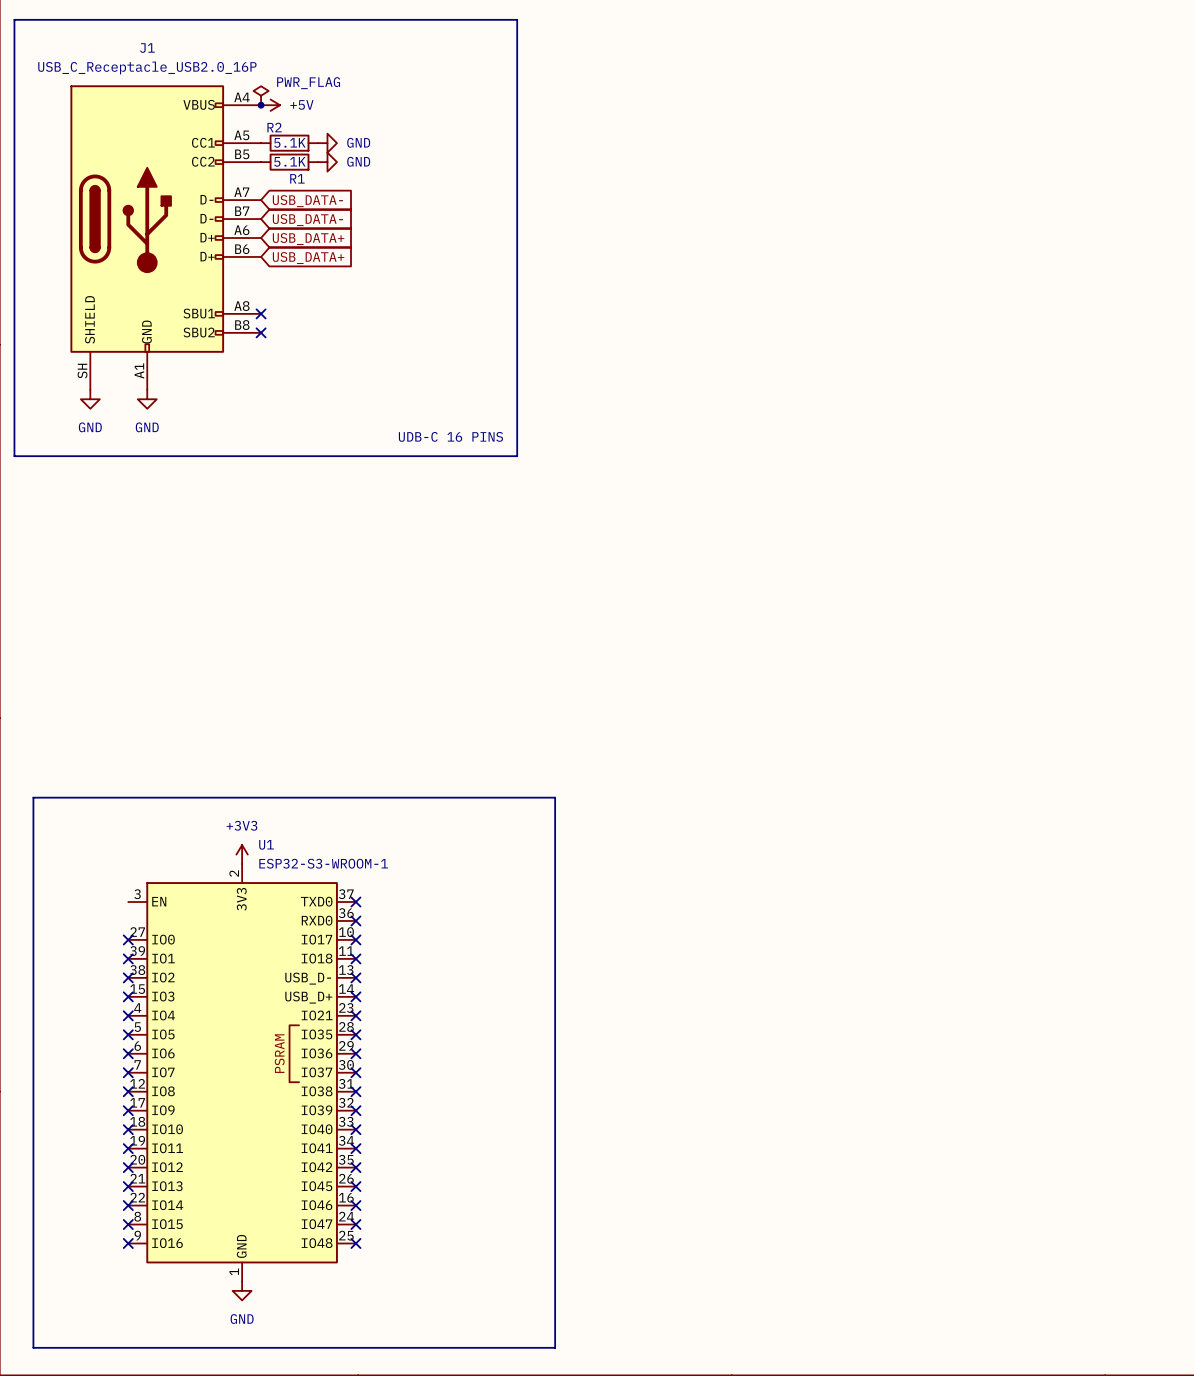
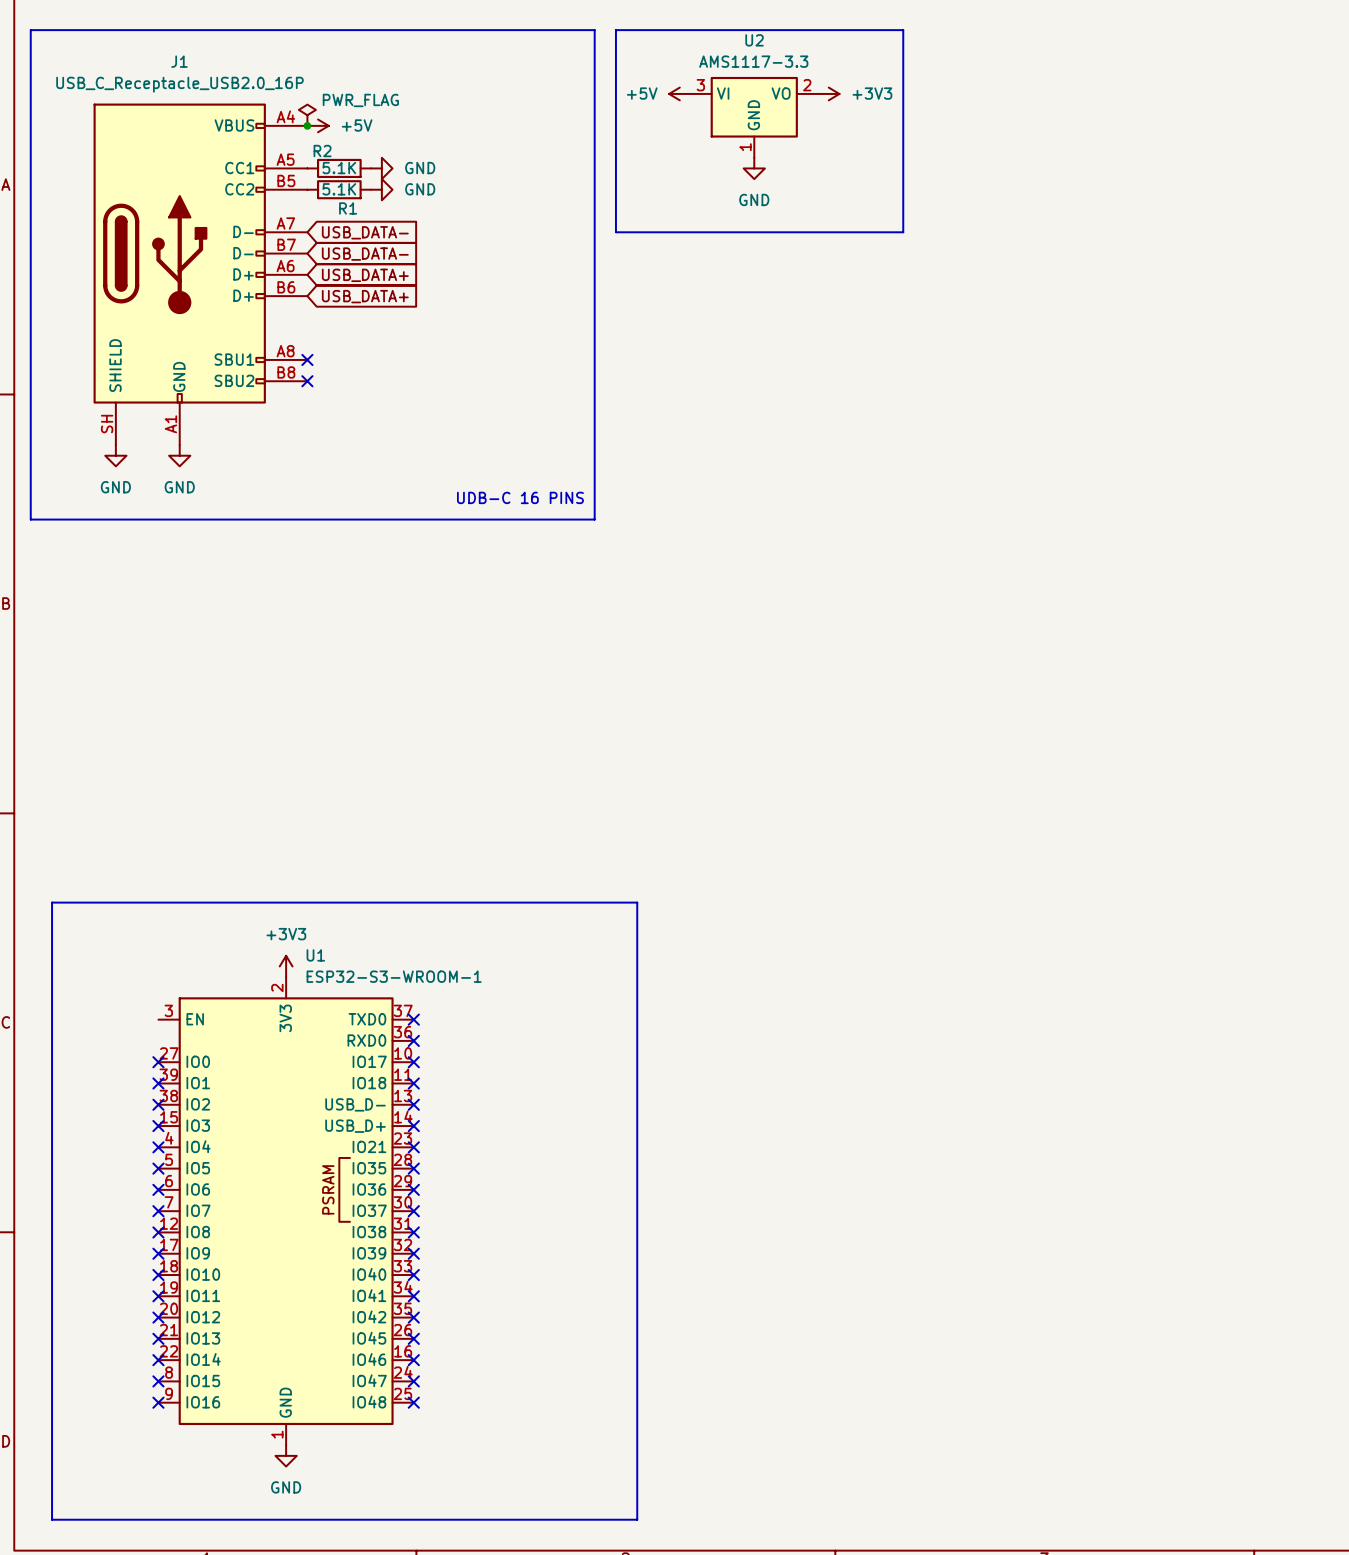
line: none -> (615, 30) (903, 30) (903, 232) (615, 232) (615, 30)
power symbol: none -> +5V (679, 93)
power symbol: none -> +3V3 (828, 93)
U2: none -> AMS1117-3.3 (754, 117)
power symbol: none -> GND (754, 168)

